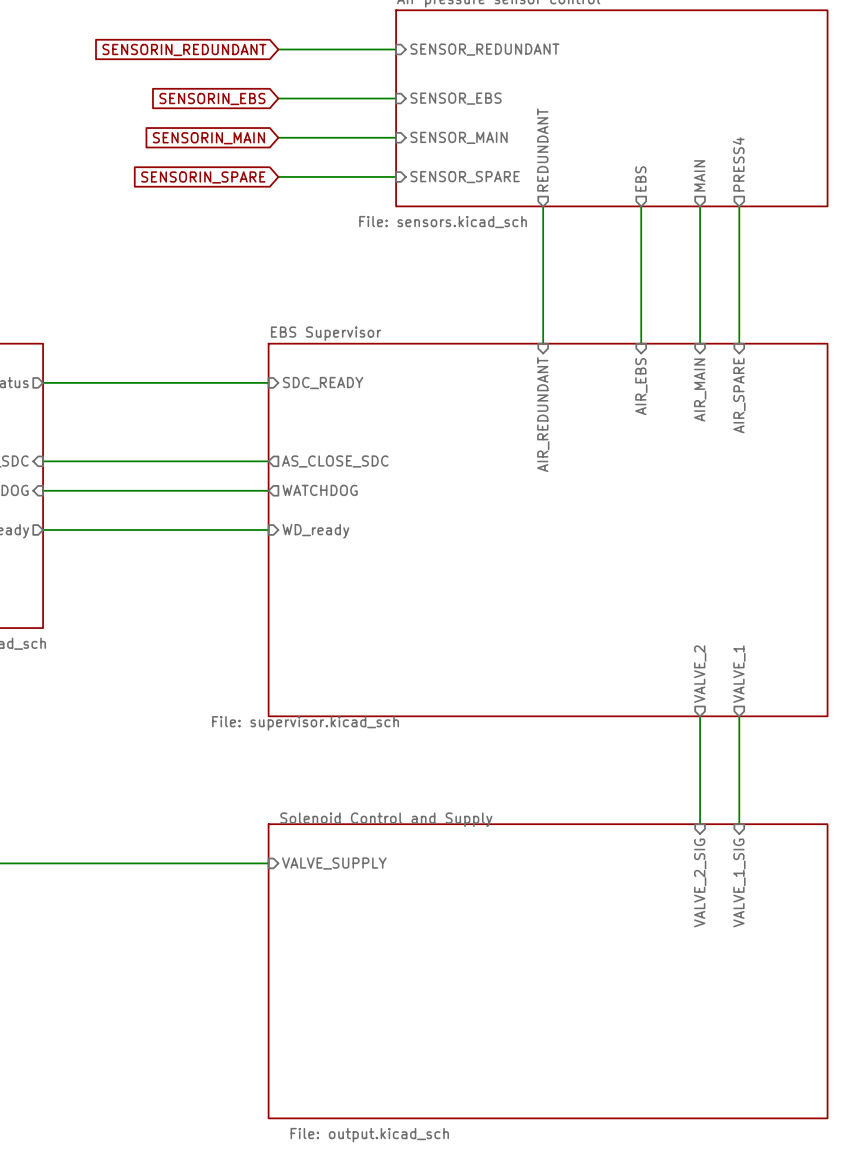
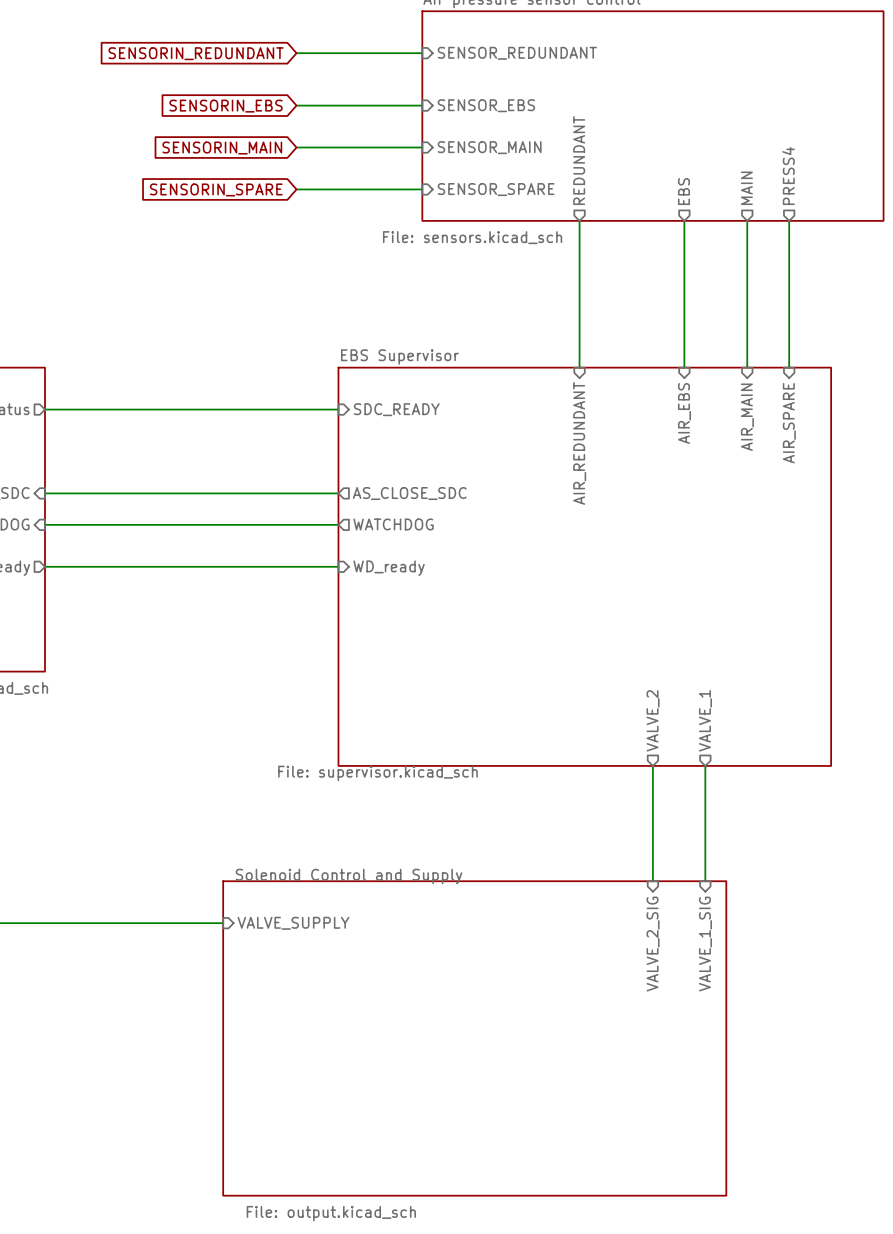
sheet EBS Supervisor name position: EBS Supervisor (326, 333) -> EBS Supervisor (399, 356)
sheet EBS Supervisor shape: [268, 343, 829, 717] -> [337, 367, 832, 767]
wire: none -> (286, 409) (338, 409)
sheet pin position: SDC_READY (323, 383) -> SDC_READY (396, 409)
wire: none -> (286, 493) (338, 493)
sheet pin position: AS_CLOSE_SDC (335, 461) -> AS_CLOSE_SDC (409, 493)
wire: none -> (286, 524) (338, 524)
sheet pin position: WATCHDOG (320, 490) -> WATCHDOG (393, 524)
wire: none -> (286, 566) (338, 566)
sheet pin position: WD_ready (315, 531) -> WD_ready (389, 568)
sheet pin position: VALVE_2 (700, 674) -> VALVE_2 (653, 720)
sheet pin position: VALVE_1 (739, 674) -> VALVE_1 (705, 720)
wire: (700, 716) (700, 824) -> (705, 765) (705, 881)
wire: (739, 716) (739, 824) -> (652, 765) (652, 881)
sheet EBS Supervisor value position: File: supervisor.kicad_sch (305, 723) -> File: supervisor.kicad_sch (377, 773)
wire: (209, 863) (268, 863) -> none
sheet pin position: VALVE_SUPPLY (334, 863) -> VALVE_SUPPLY (293, 923)
sheet pin position: VALVE_2_SIG (700, 882) -> VALVE_2_SIG (653, 944)
sheet pin position: VALVE_1_SIG (739, 882) -> VALVE_1_SIG (705, 944)
sheet Solenoid Control and Supply: none -> File: output.kicad_sch (474, 1038)
sheet Solenoid Control and Supply: File: output.kicad_sch (548, 971) -> none

